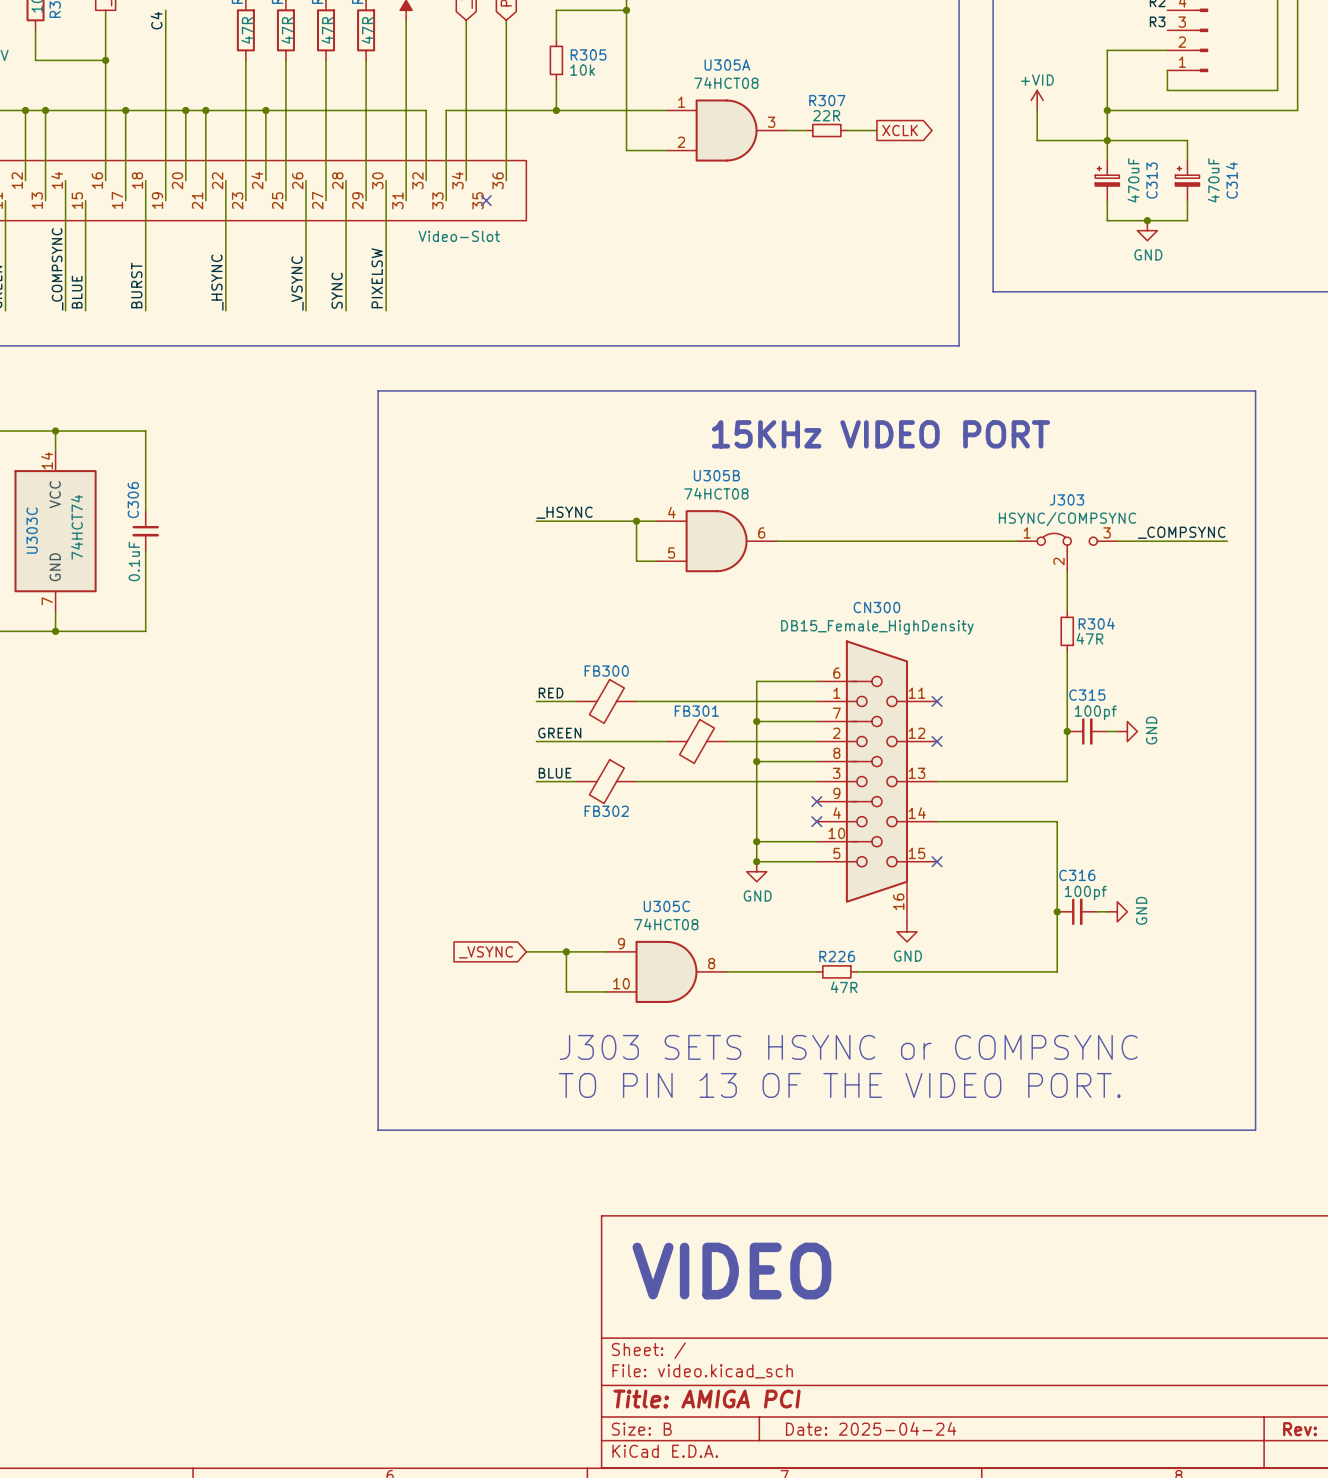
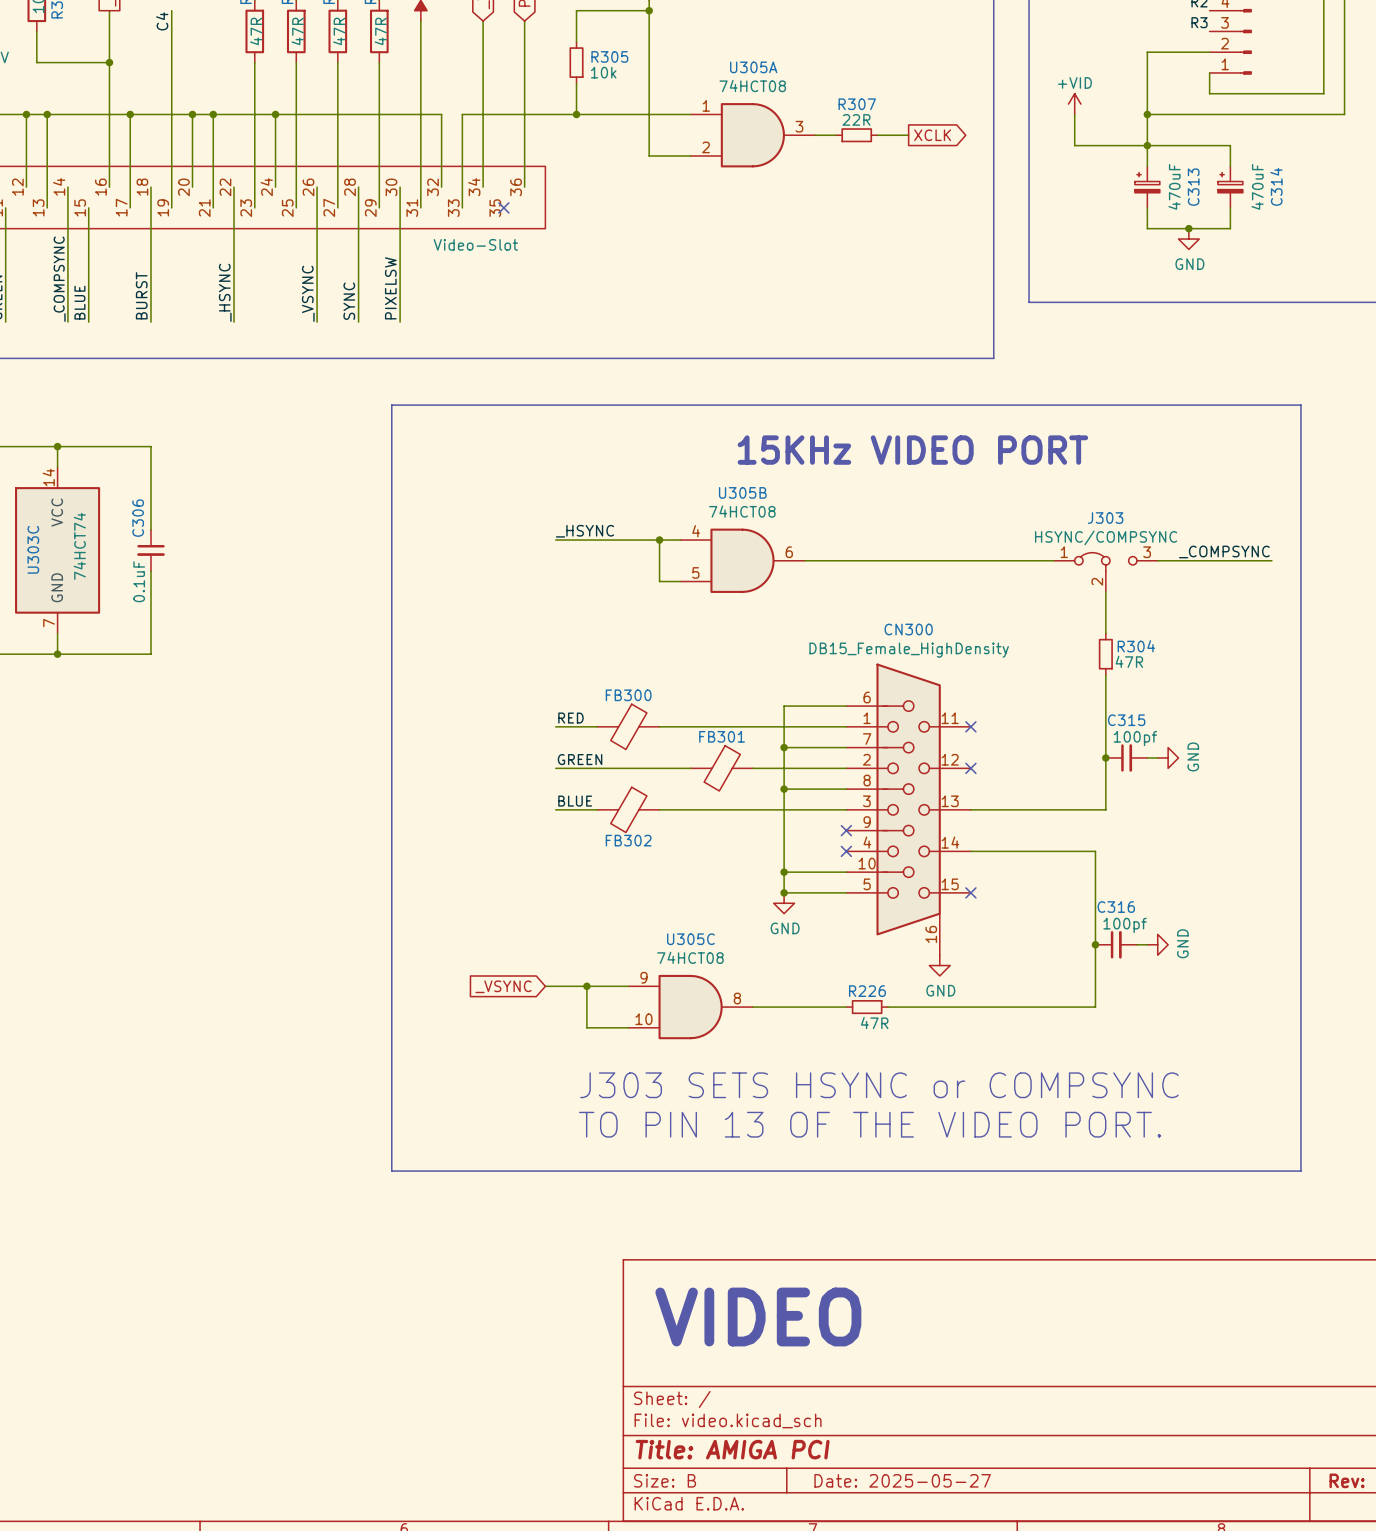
title block: Date: 2025-04-24 (871, 1428) -> Date: 2025-05-27 (902, 1480)

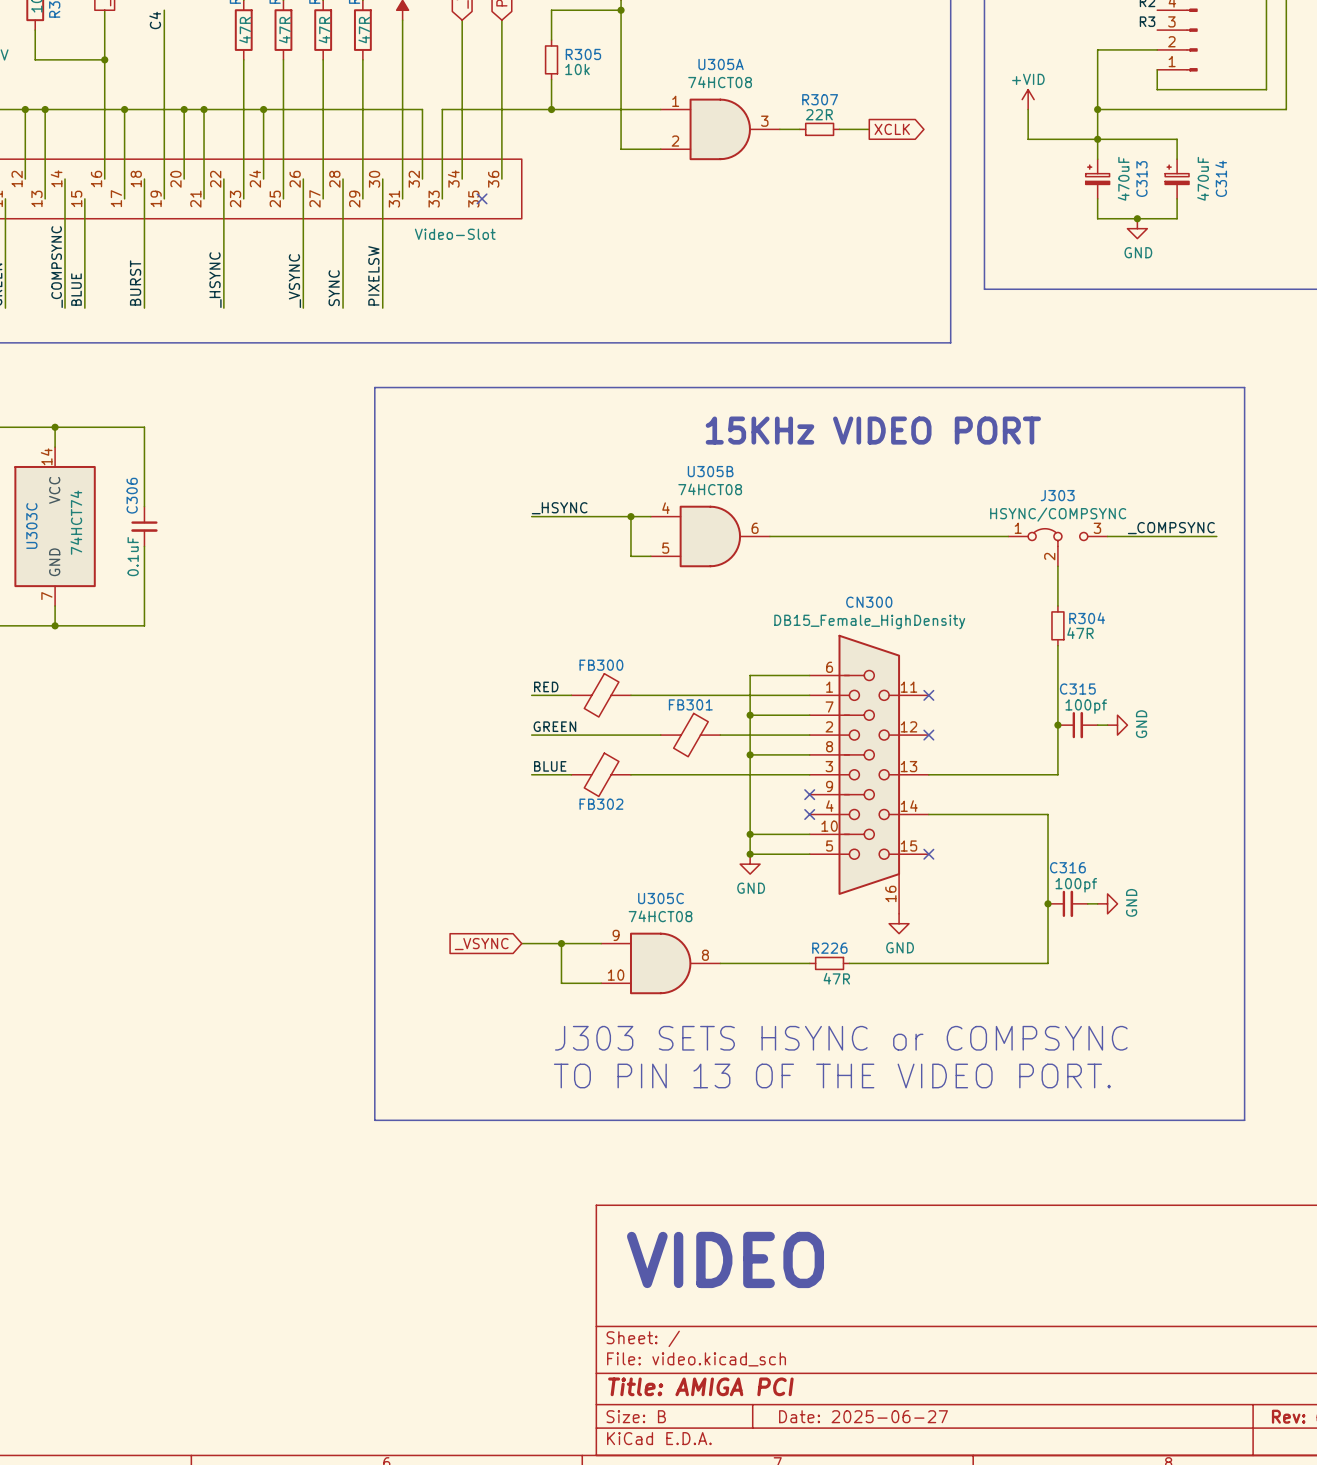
title block: Date: 2025-05-27 (902, 1480) -> Date: 2025-06-27 (863, 1416)

